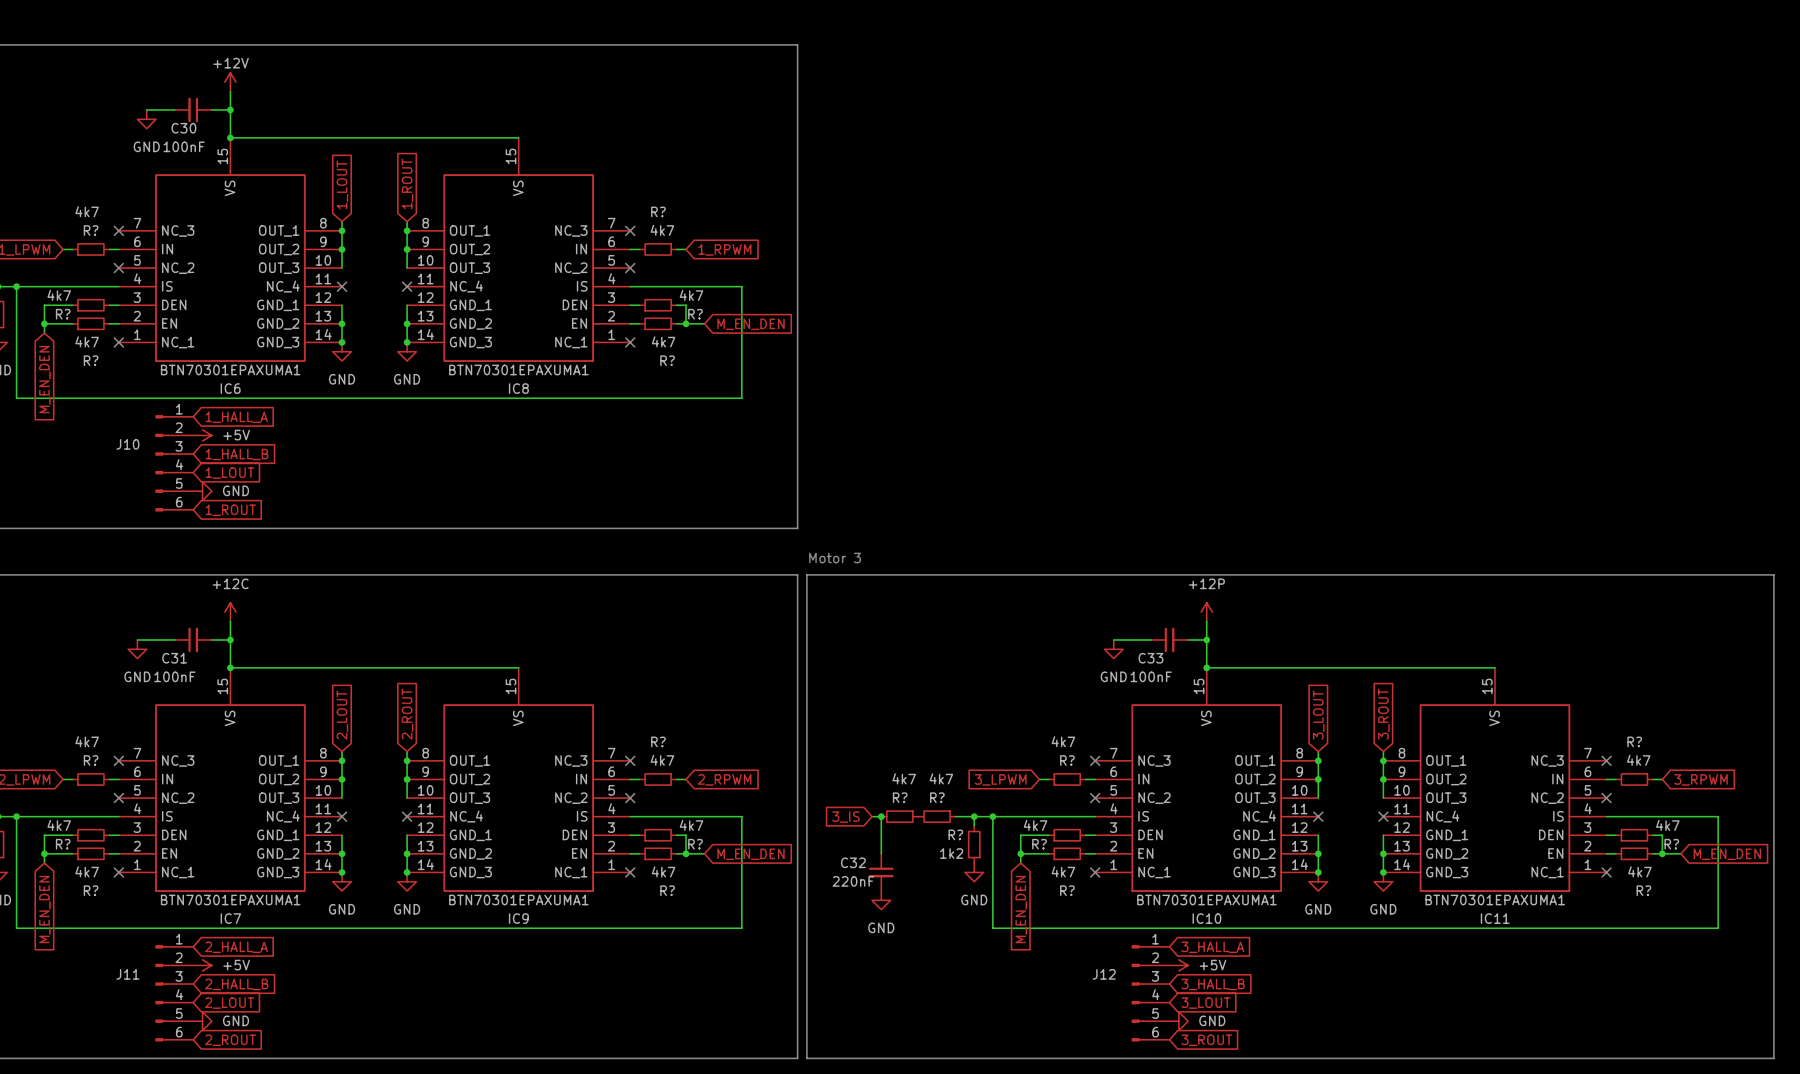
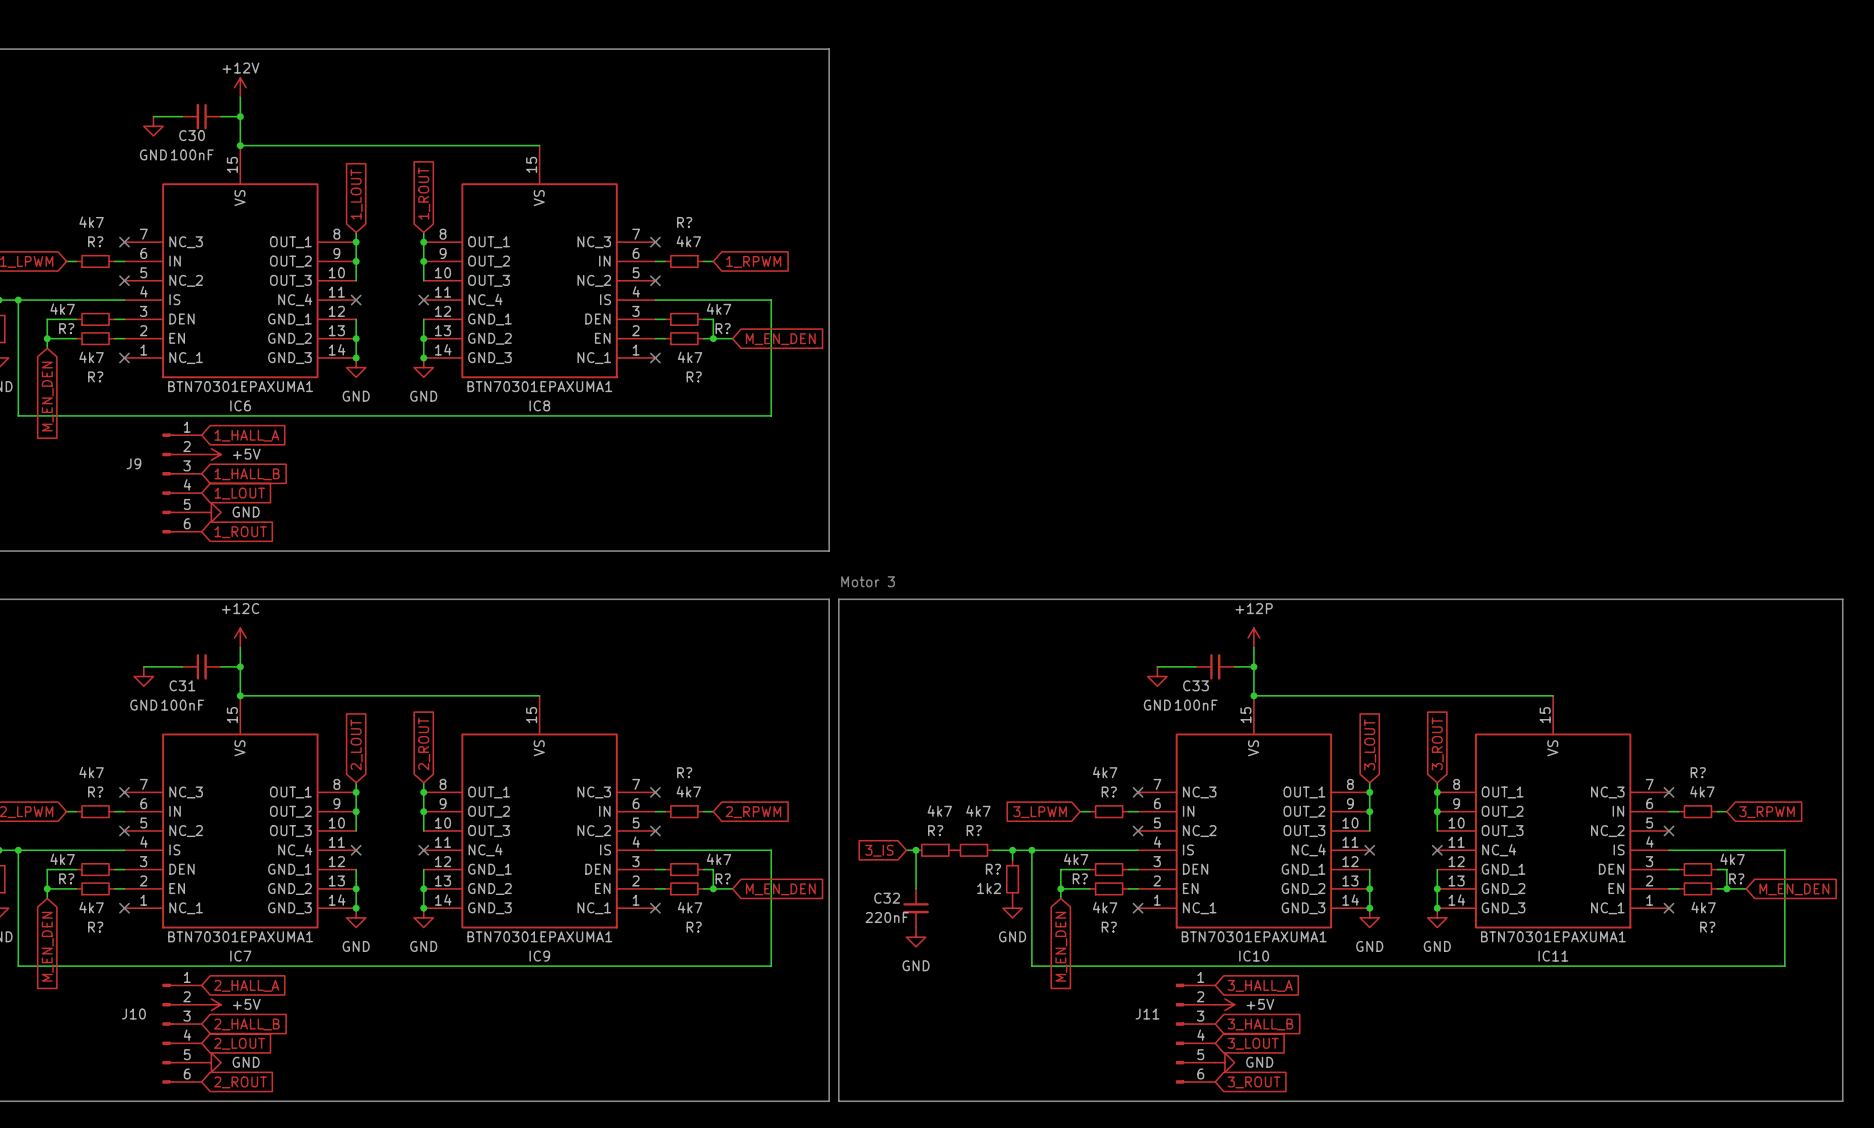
J10 name: J10 (127, 444) -> J9 (133, 463)
J11 name: J11 (127, 974) -> J10 (133, 1014)
J12 name: J12 (1104, 974) -> J11 (1147, 1014)

